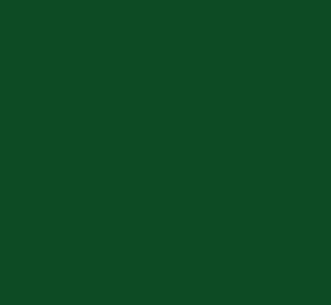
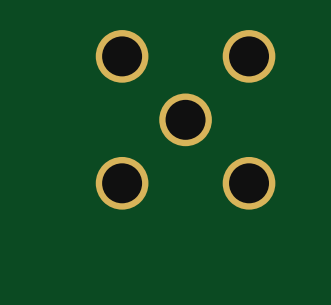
part: none -> (185, 119)

